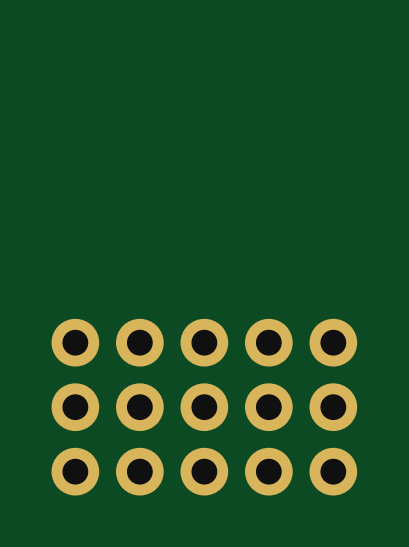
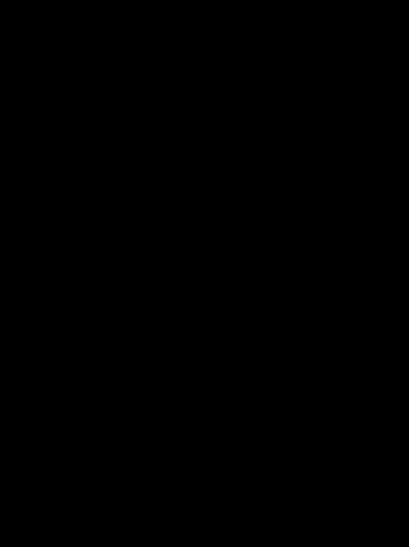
part: (204, 342) -> none
part: (204, 407) -> none
part: (204, 471) -> none

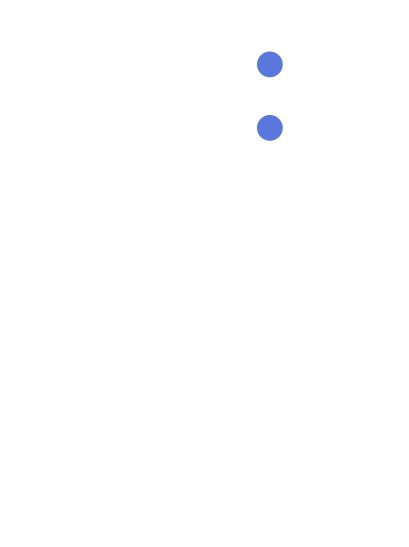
part: none -> (269, 64)
part: none -> (269, 127)

